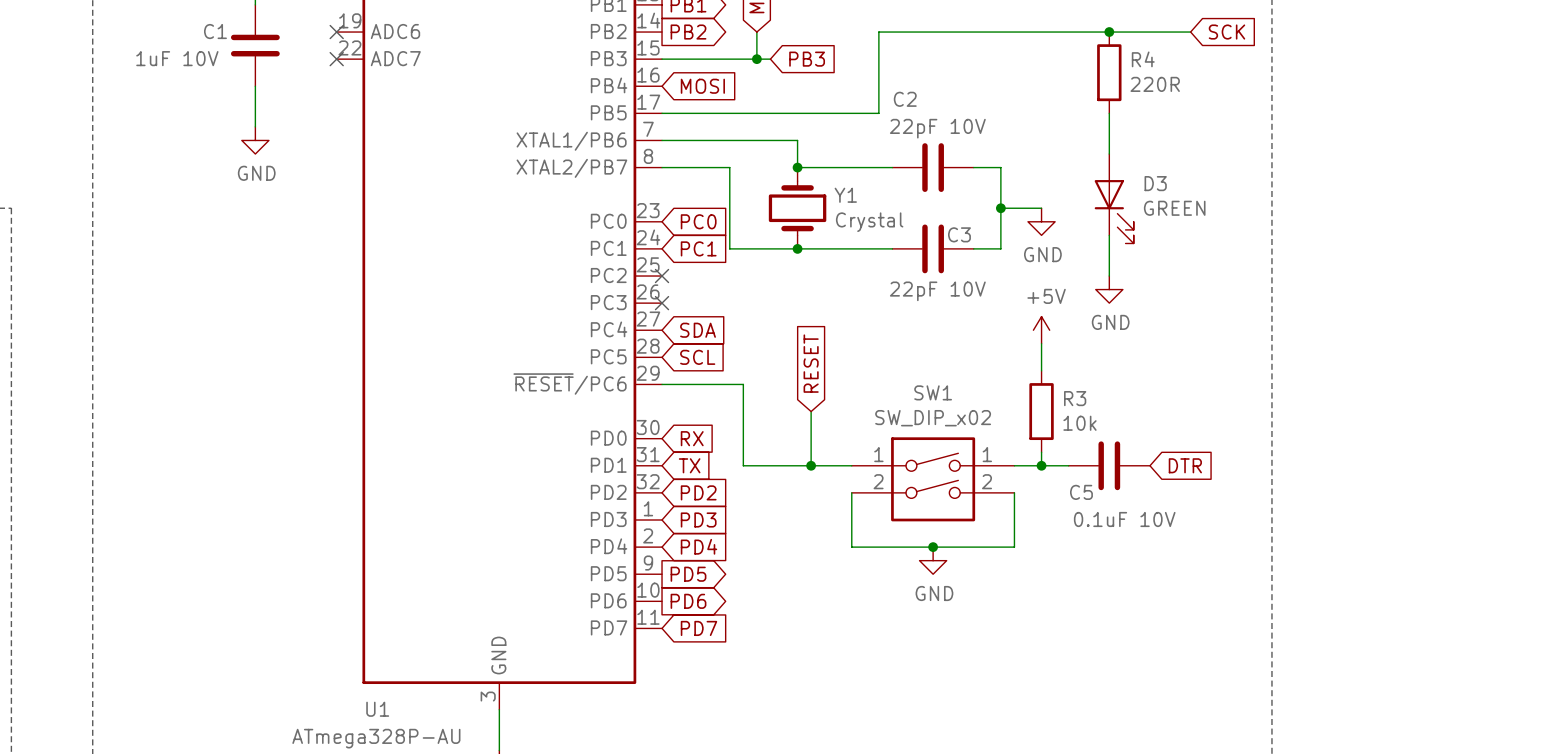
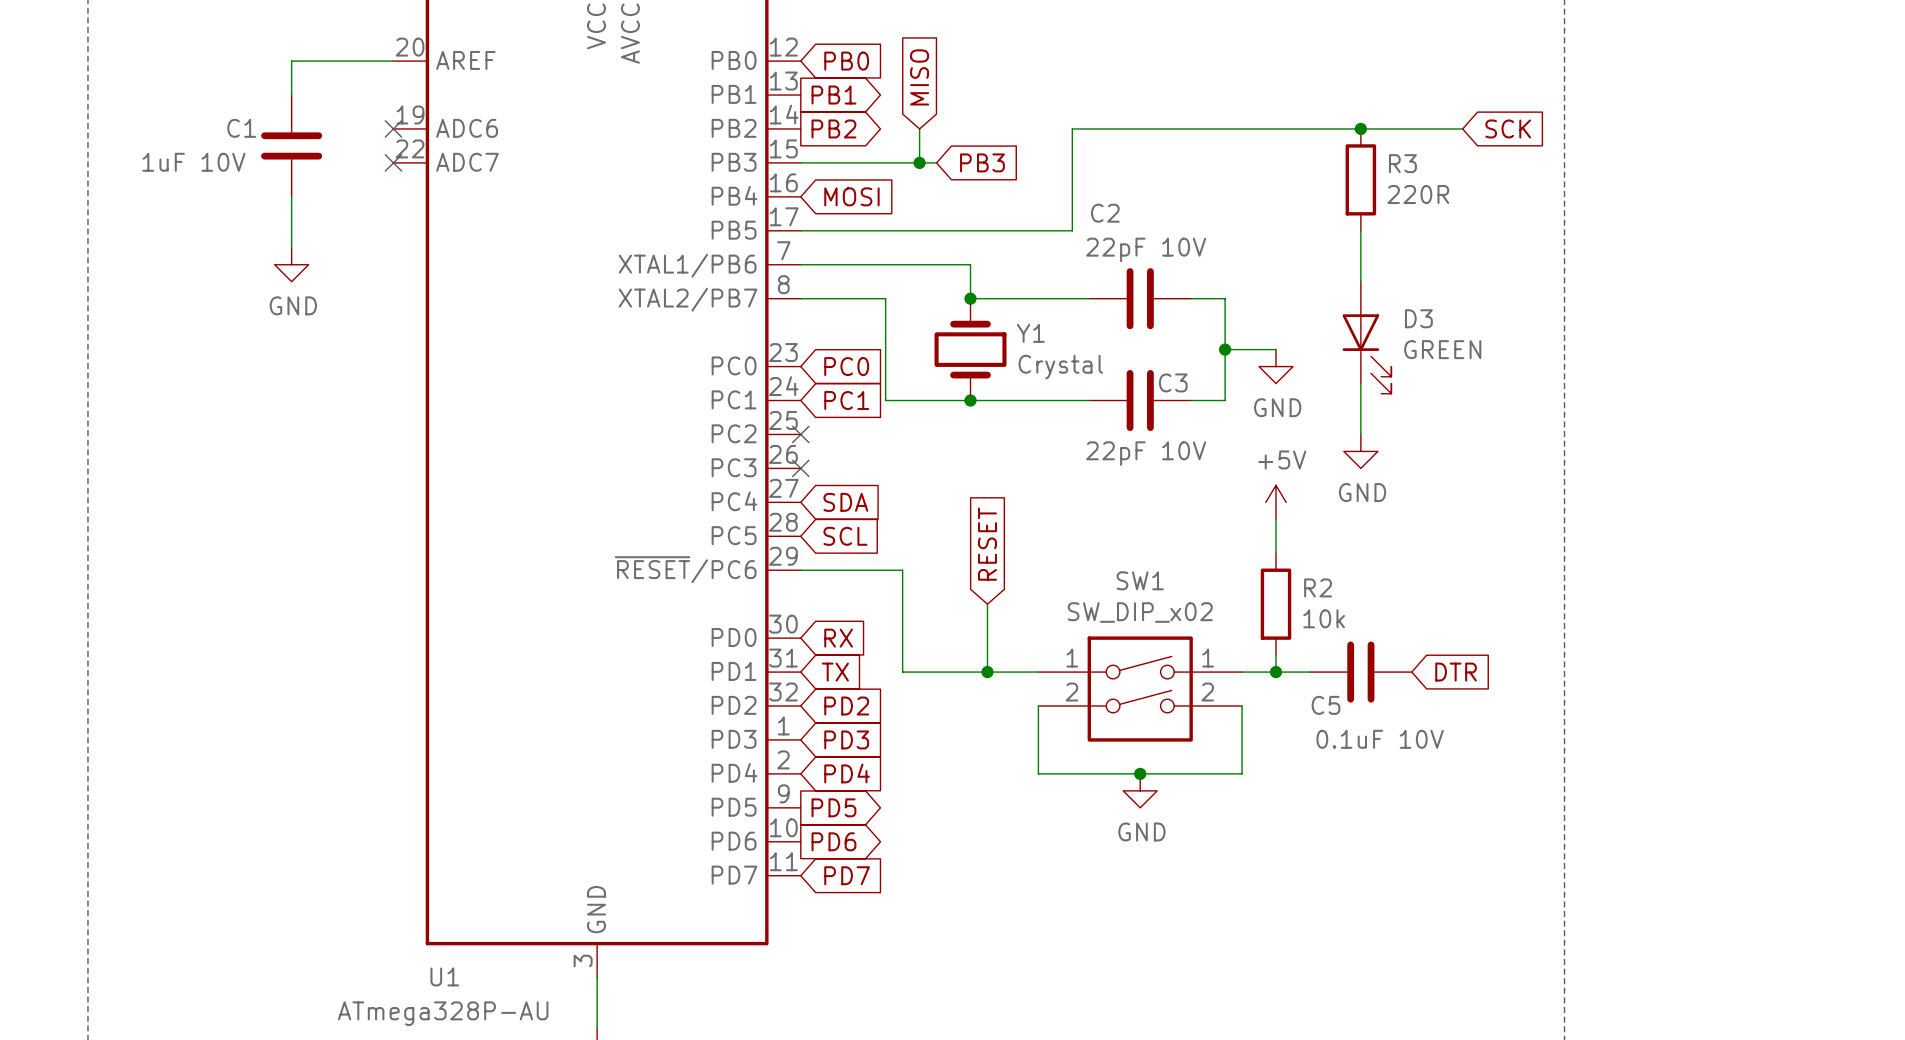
R4 name: R4 (1143, 59) -> R3 (1402, 163)
R3 name: R3 (1075, 398) -> R2 (1318, 587)

